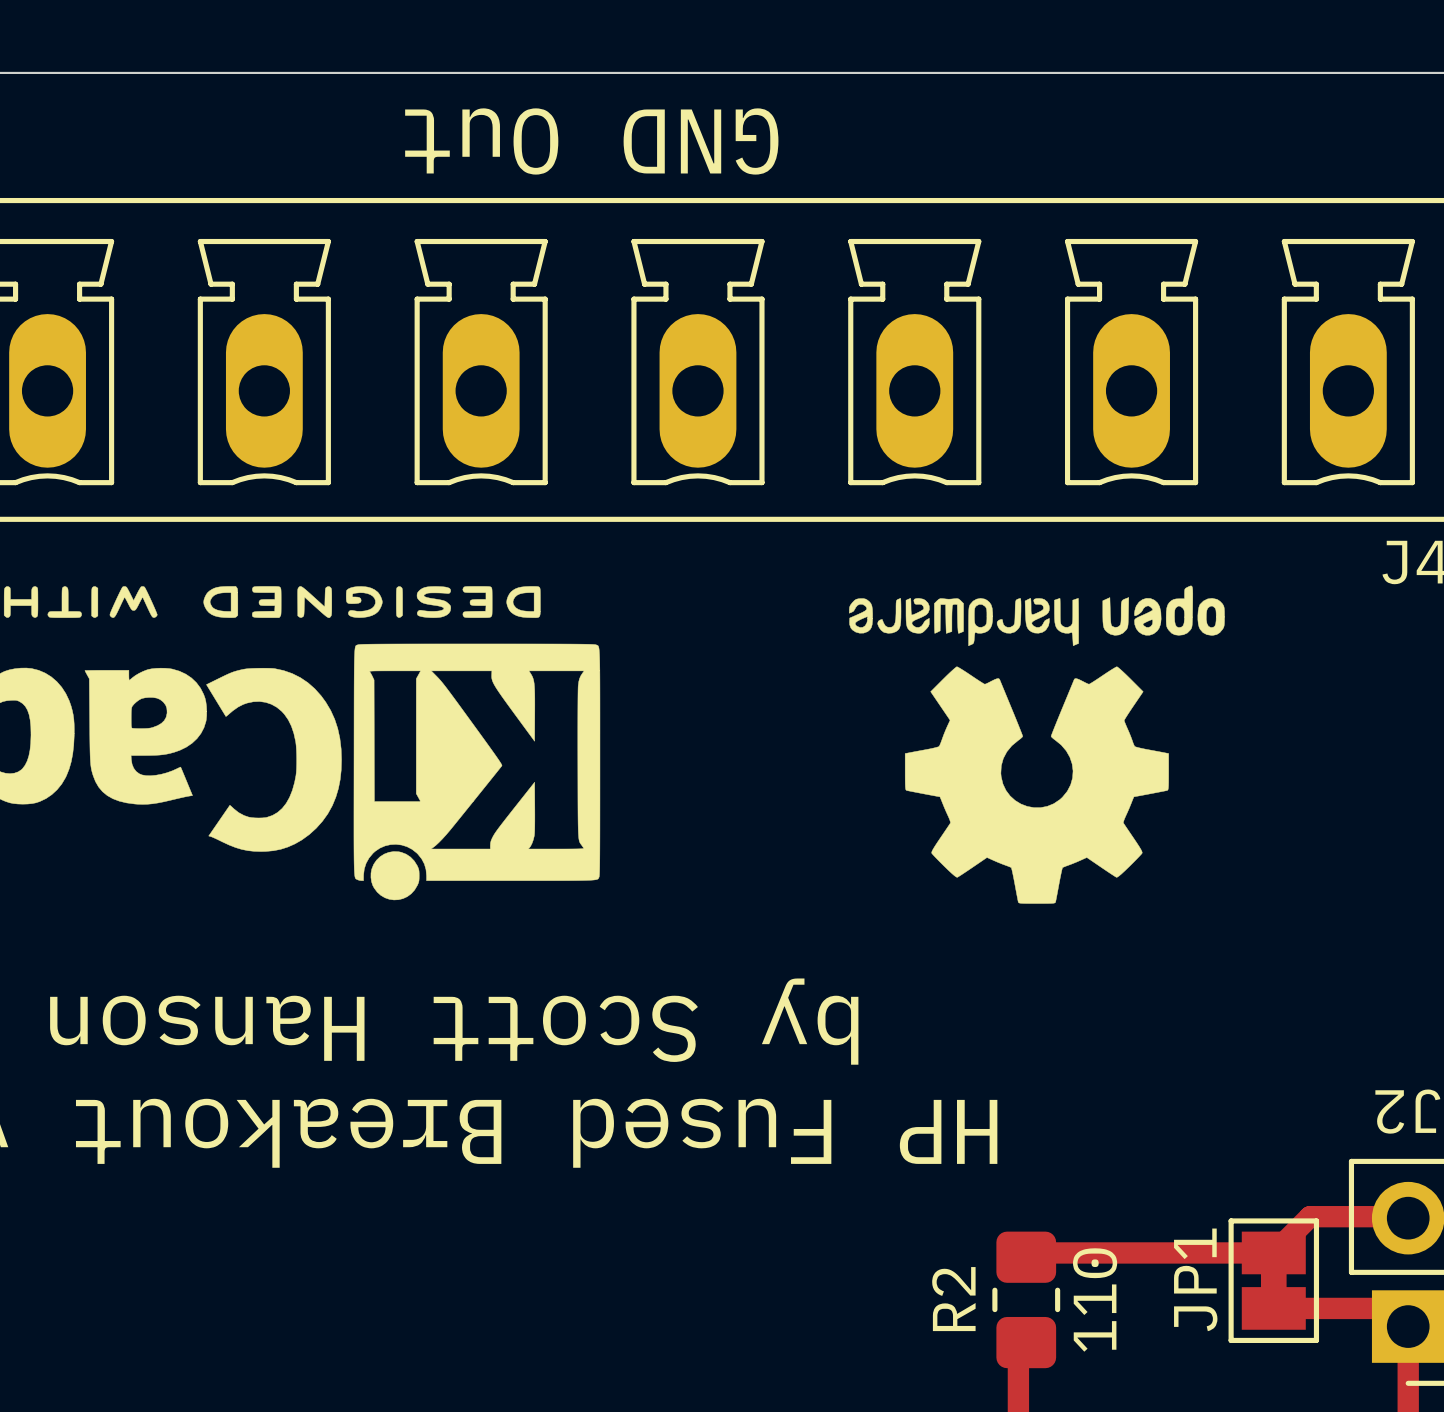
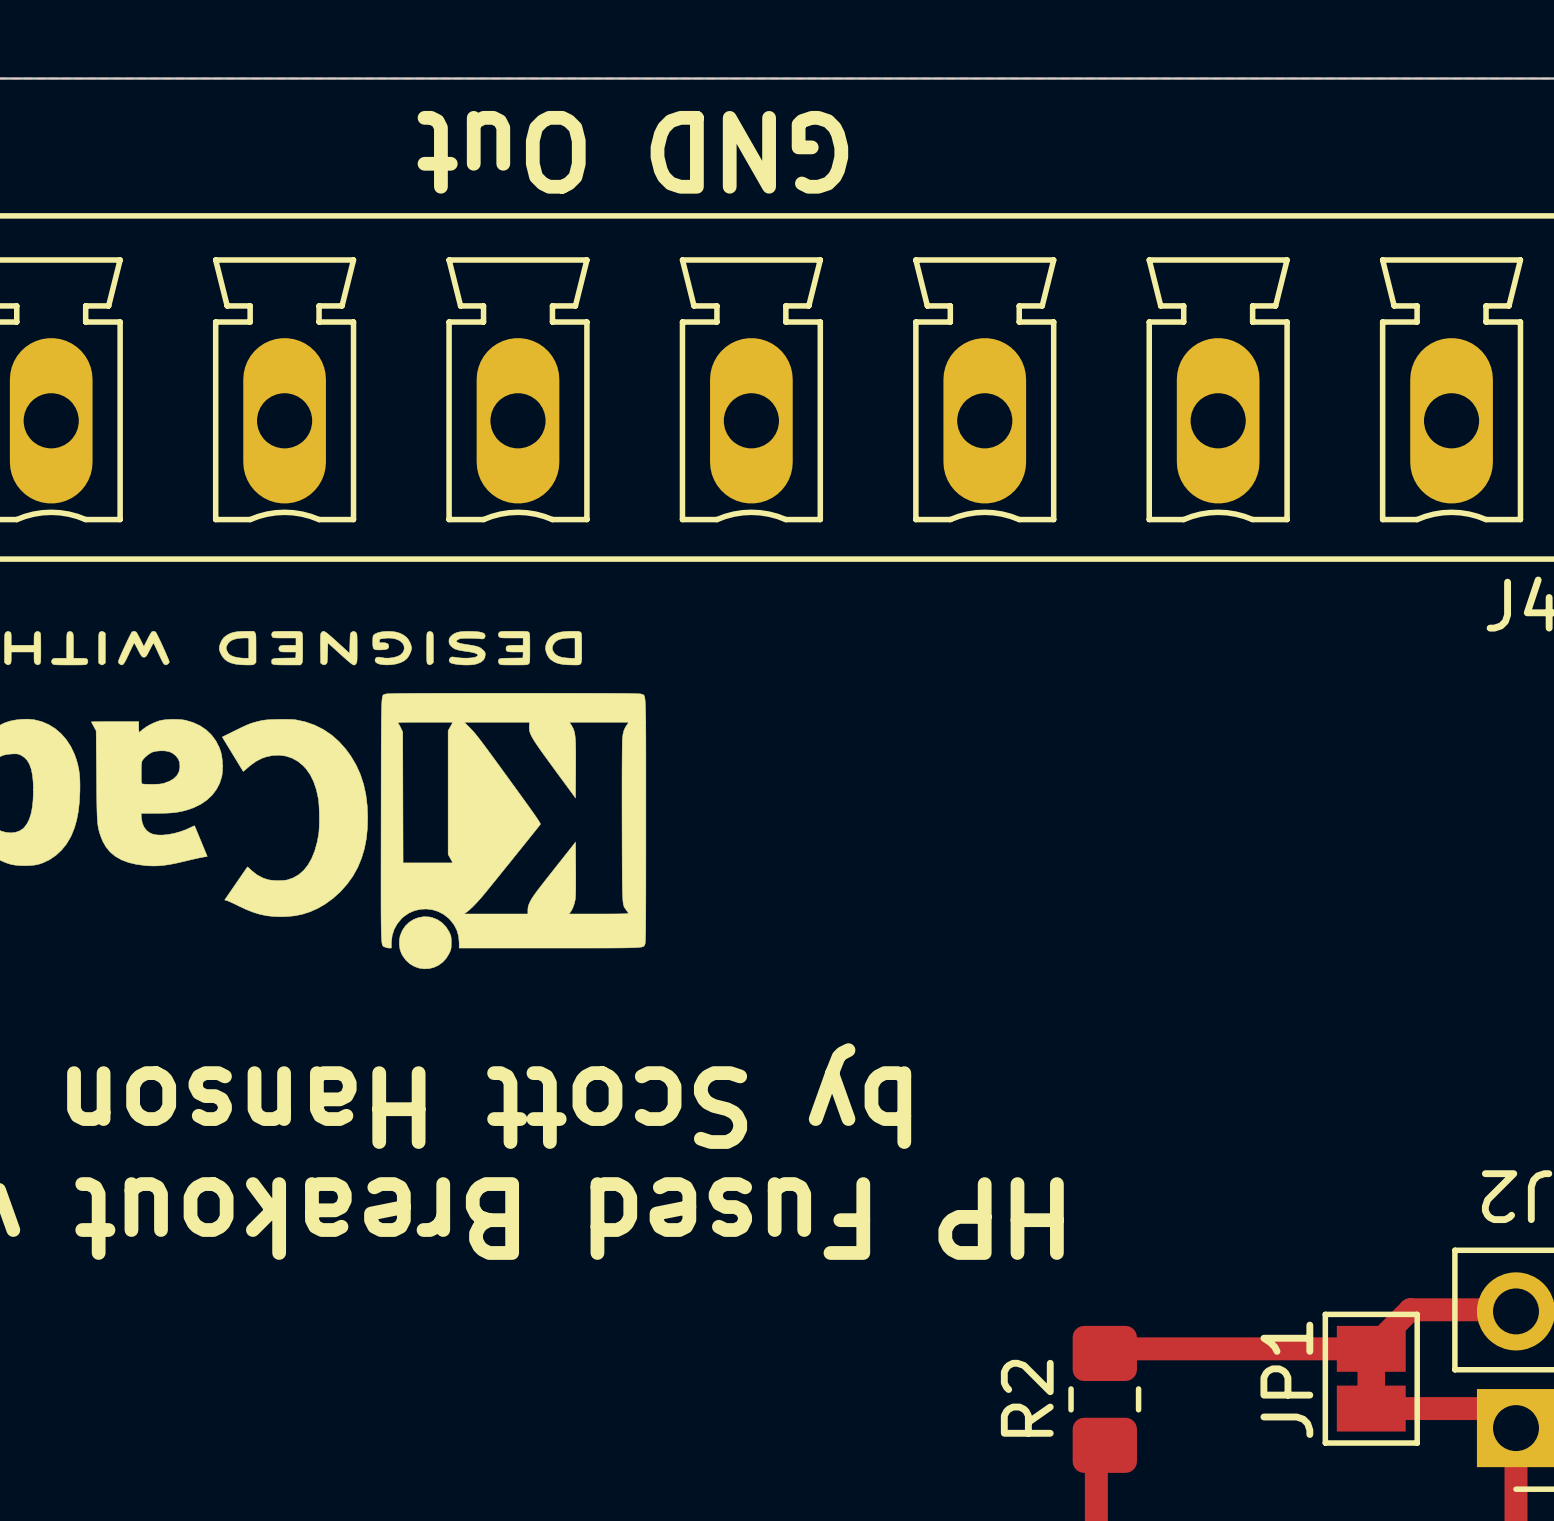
drawing: [849, 585, 1225, 904] -> none
R2 value: 110 (1095, 1299) -> none

